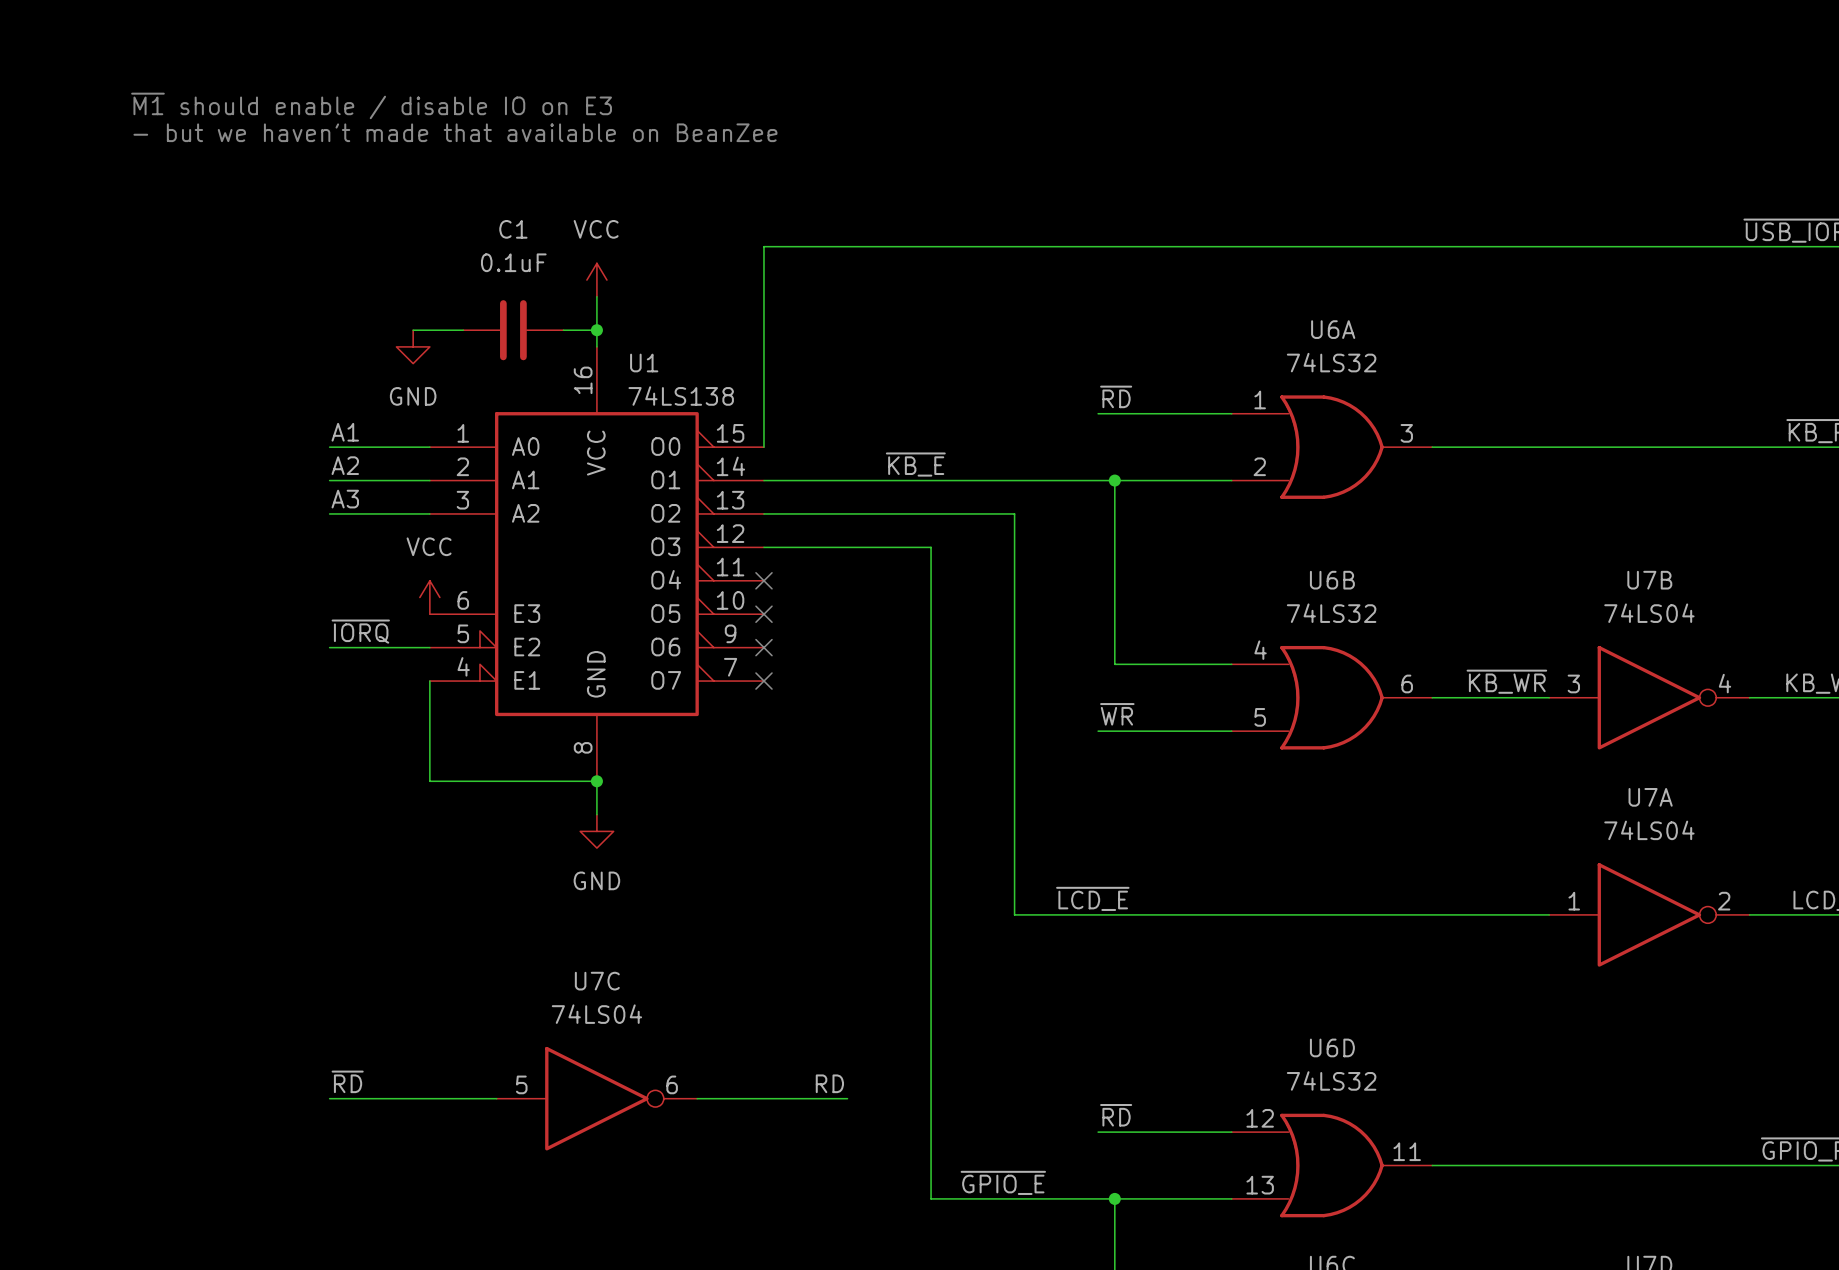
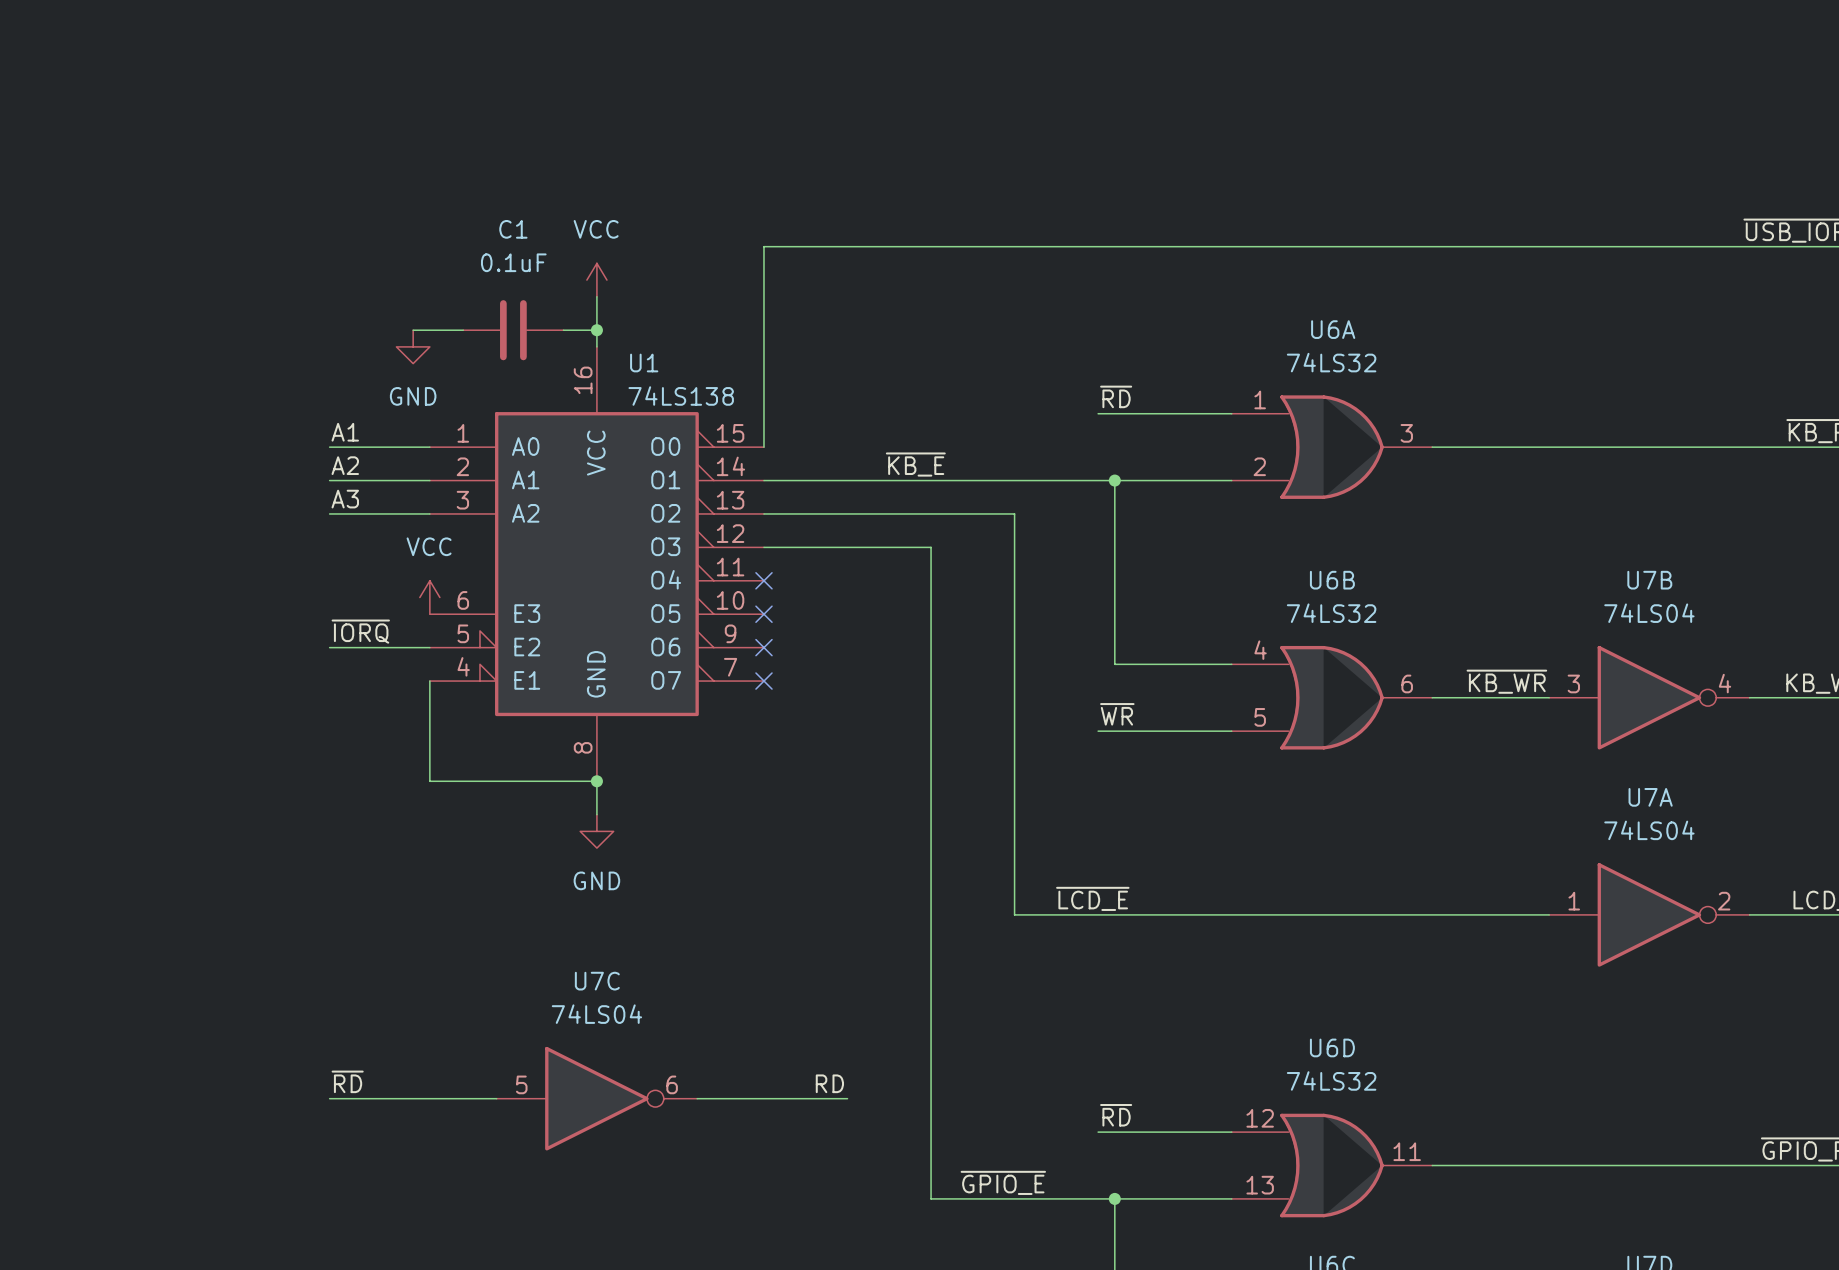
text: ~{M1} should enable / disable IO on E3 (371, 105) -> none
text: - but we haven't made that available on BeanZee (455, 132) -> none

